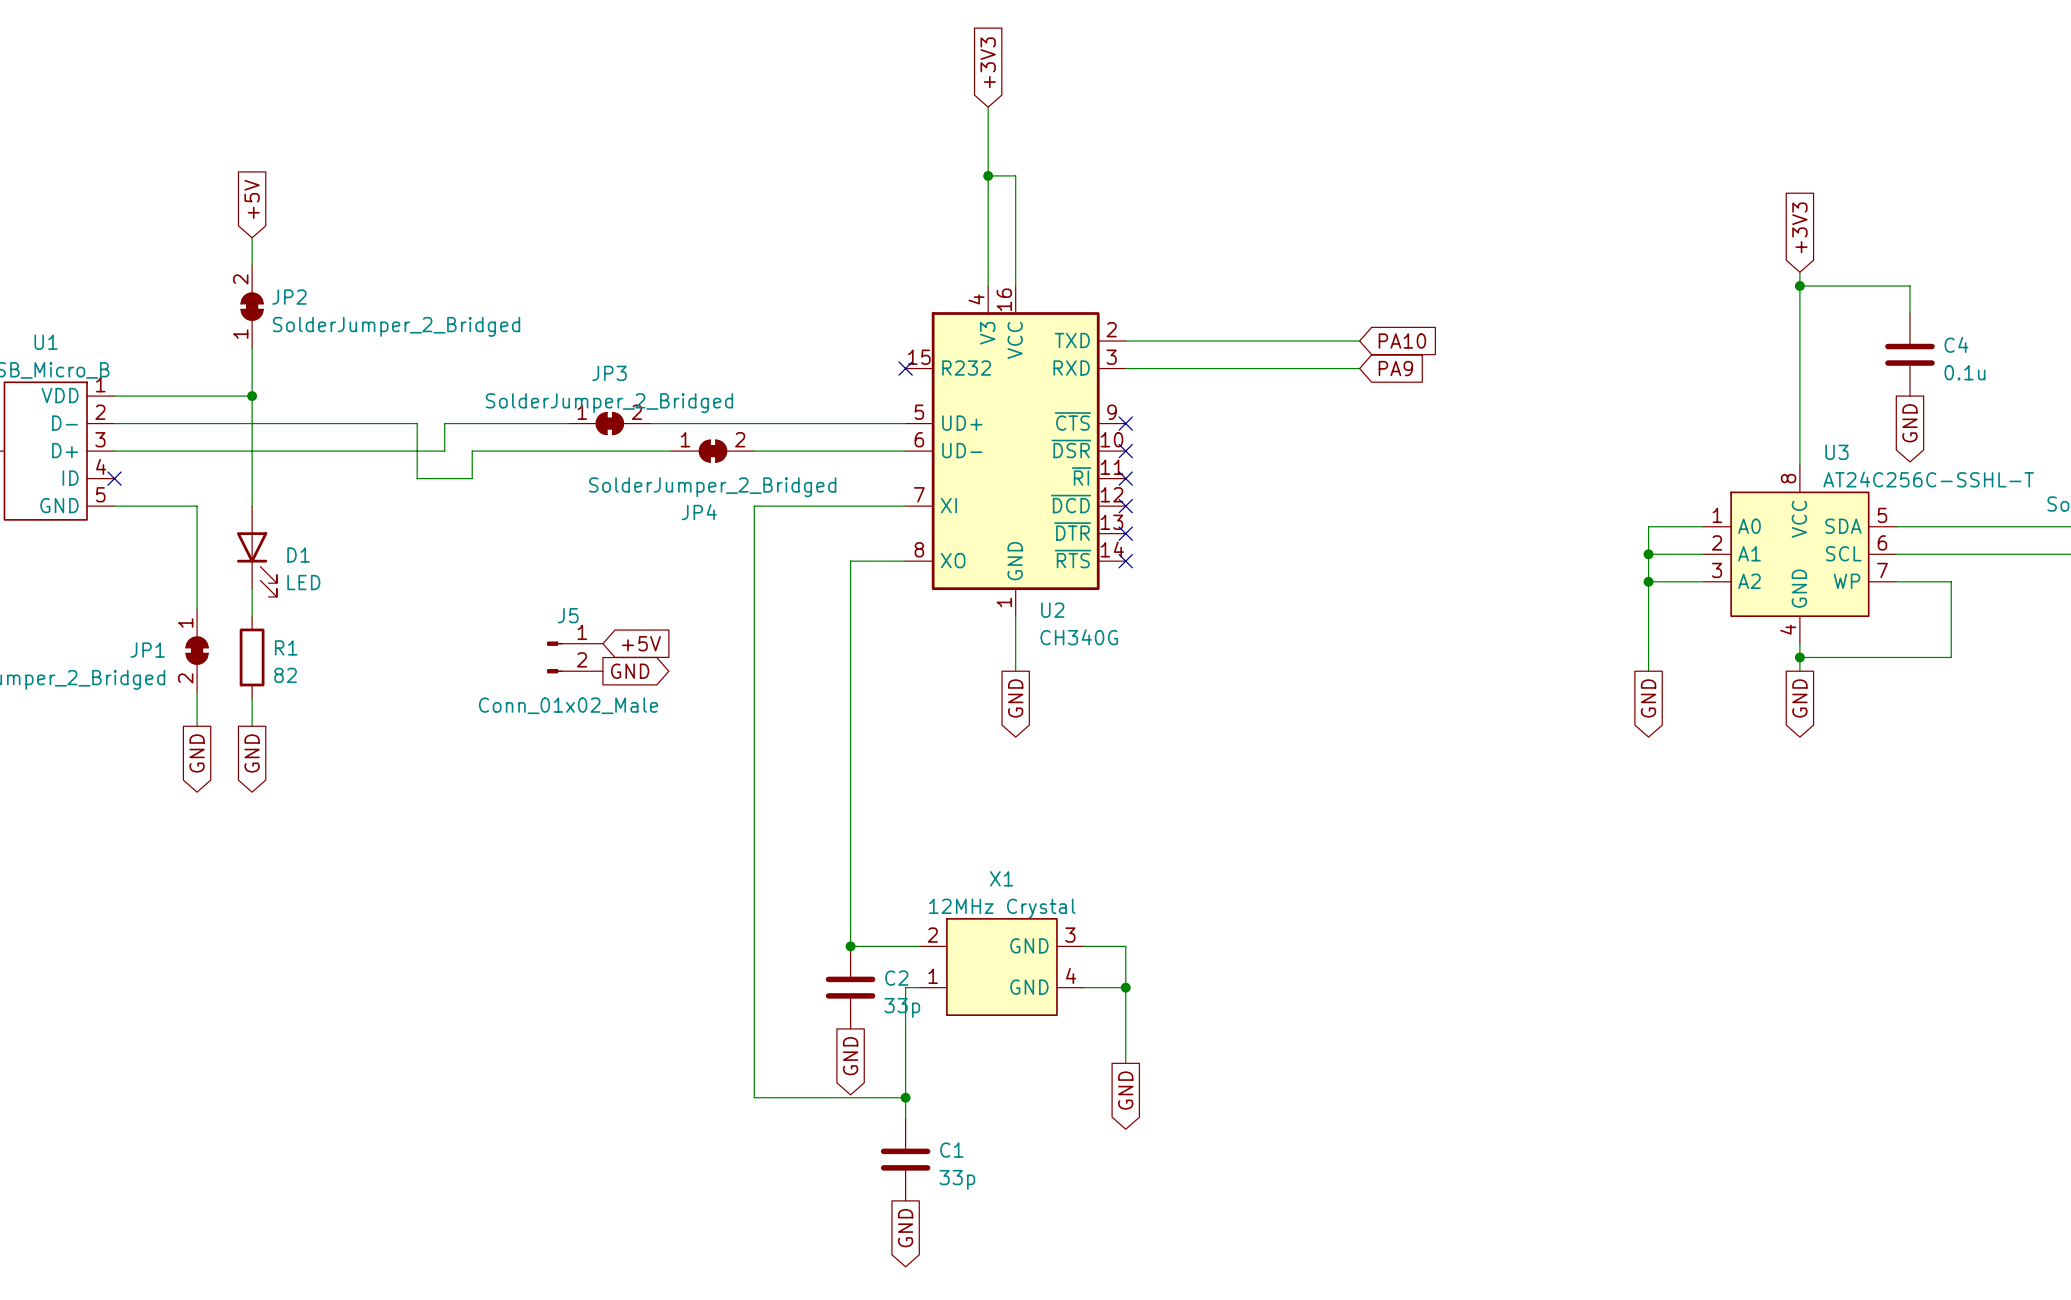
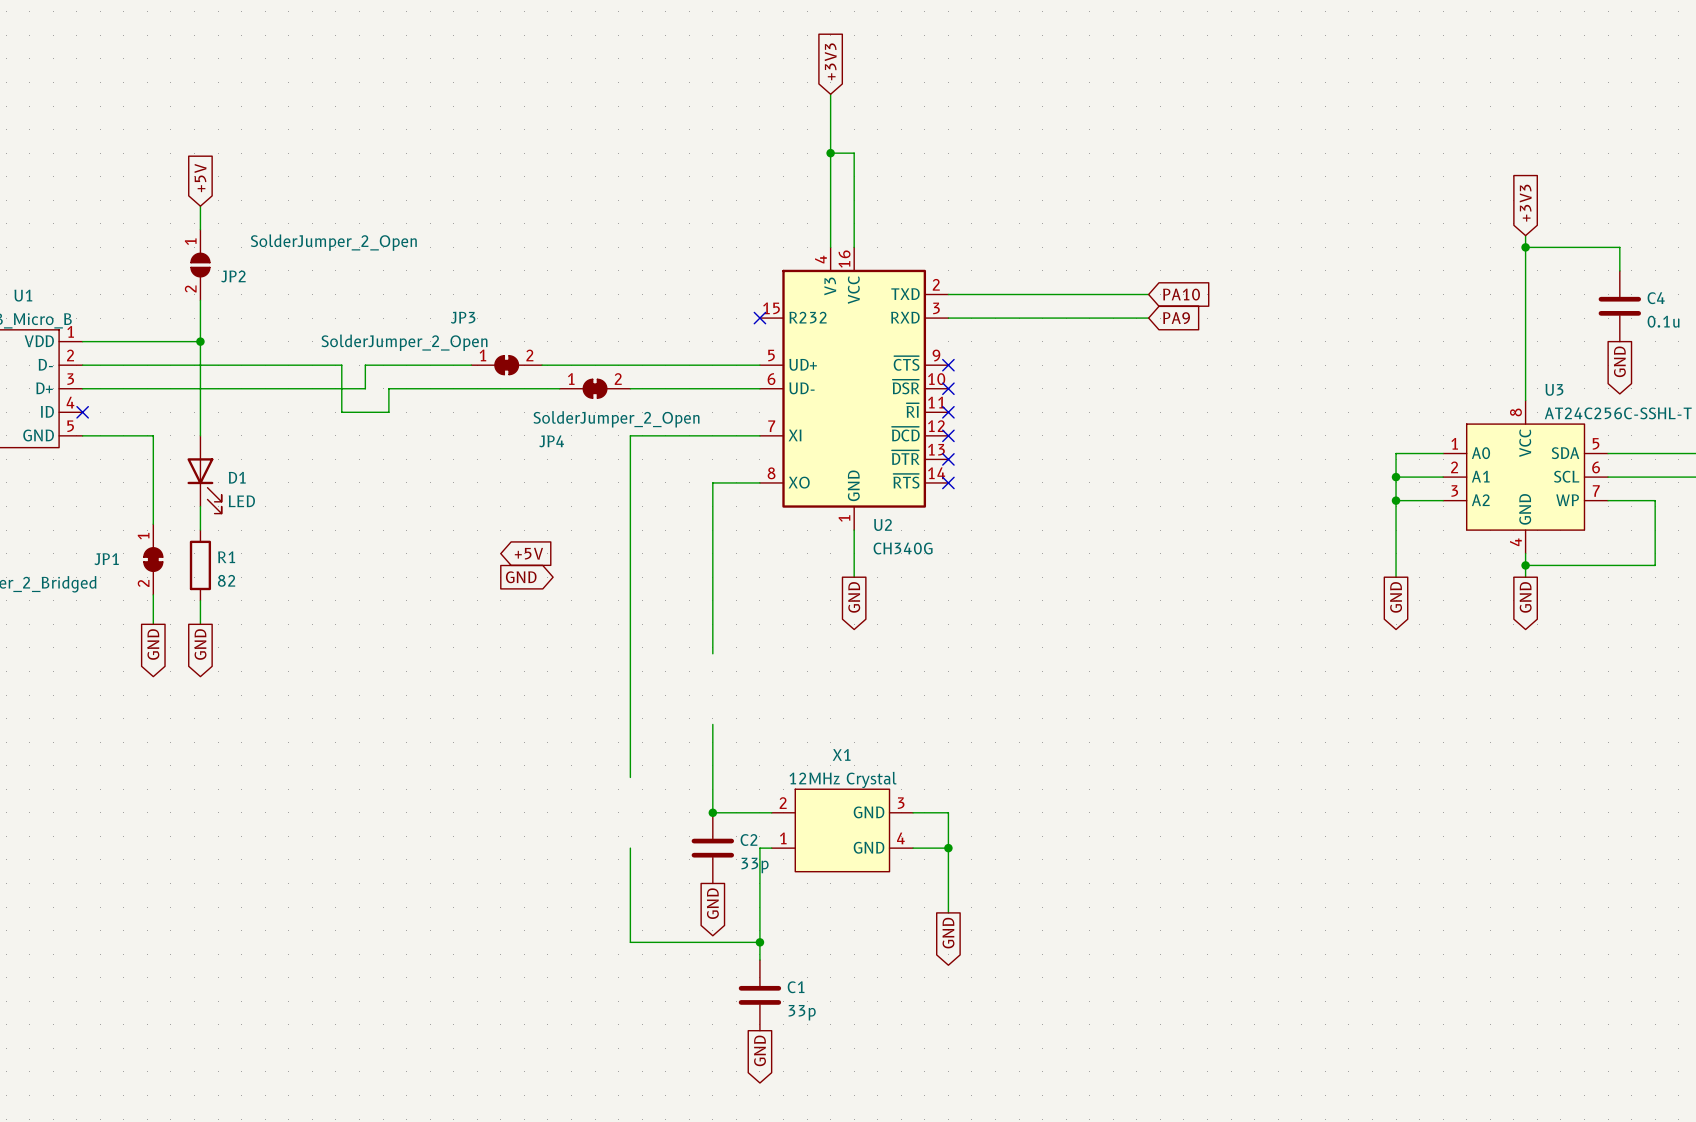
JP2 symbol: [241, 265, 264, 348] -> [191, 229, 210, 301]
JP2 name position: JP2 (289, 297) -> JP2 (233, 276)
JP2 value: SolderJumper_2_Bridged (396, 326) -> SolderJumper_2_Open (333, 242)
JP3 name position: JP3 (609, 373) -> JP3 (463, 317)
JP3 value: SolderJumper_2_Bridged (609, 403) -> SolderJumper_2_Open (404, 342)
JP4 value: SolderJumper_2_Bridged (712, 487) -> SolderJumper_2_Open (616, 419)
JP4 name position: JP4 (699, 512) -> JP4 (551, 441)
J5: Conn_01x02_Male (575, 657) -> none
wire: (850, 760) (850, 843) -> none
wire: (754, 905) (754, 987) -> none

